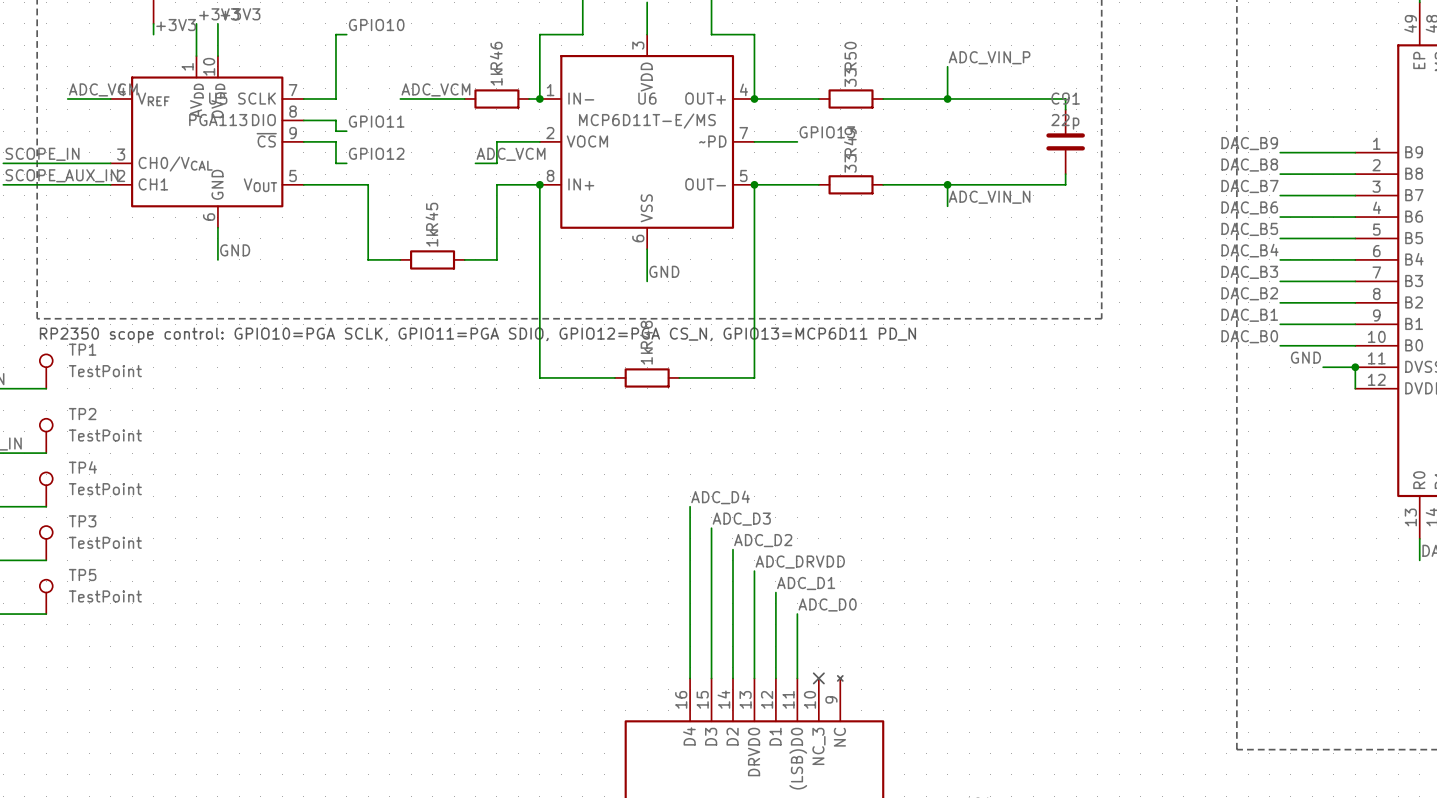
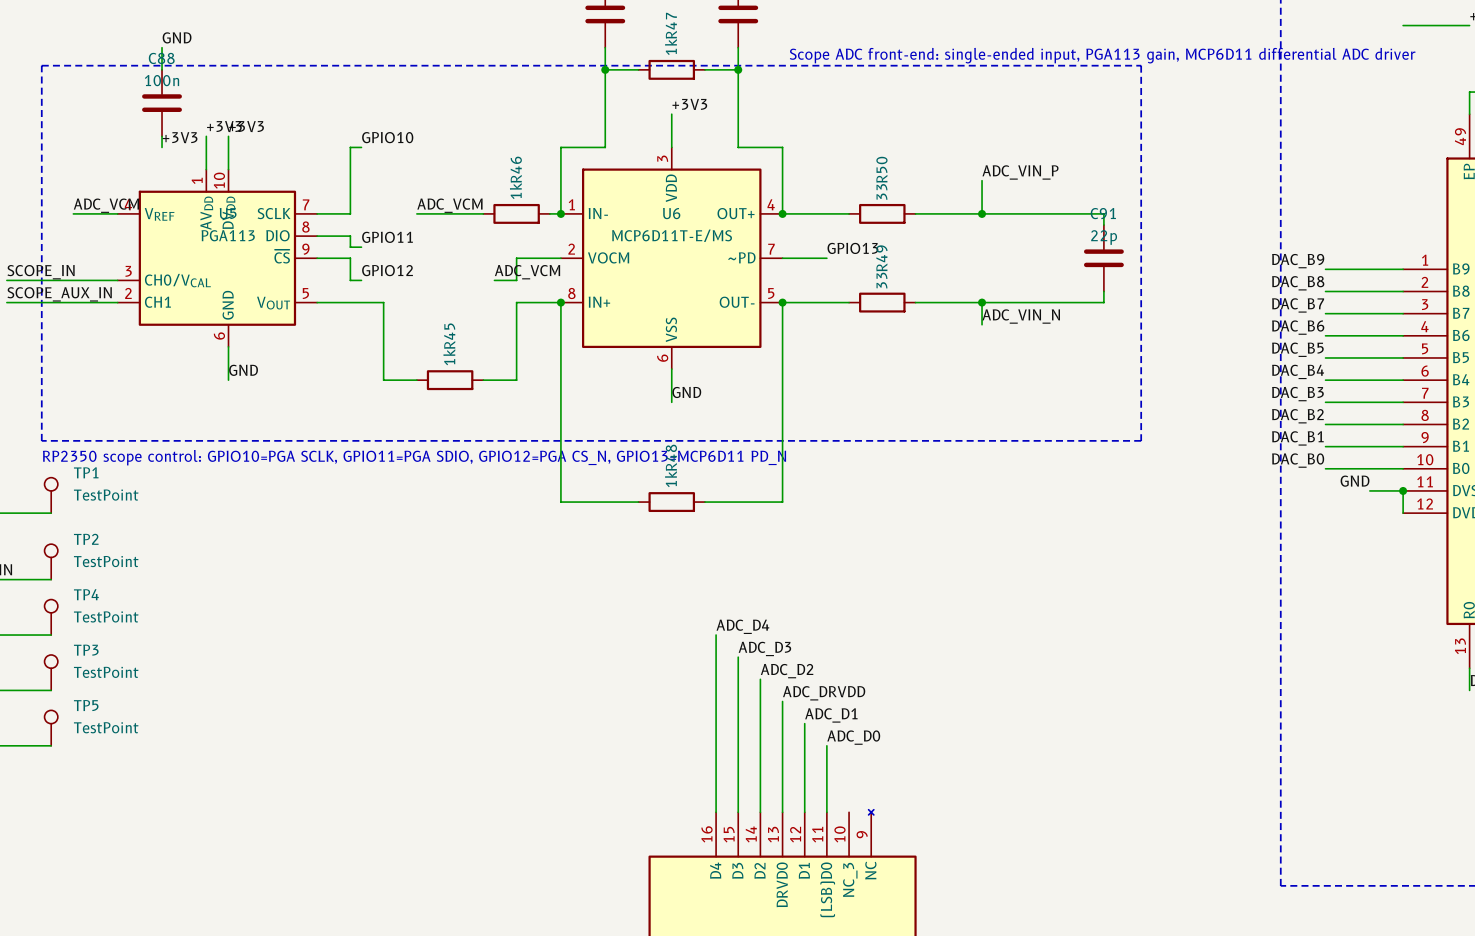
no-connect mark: (818, 678) -> none

